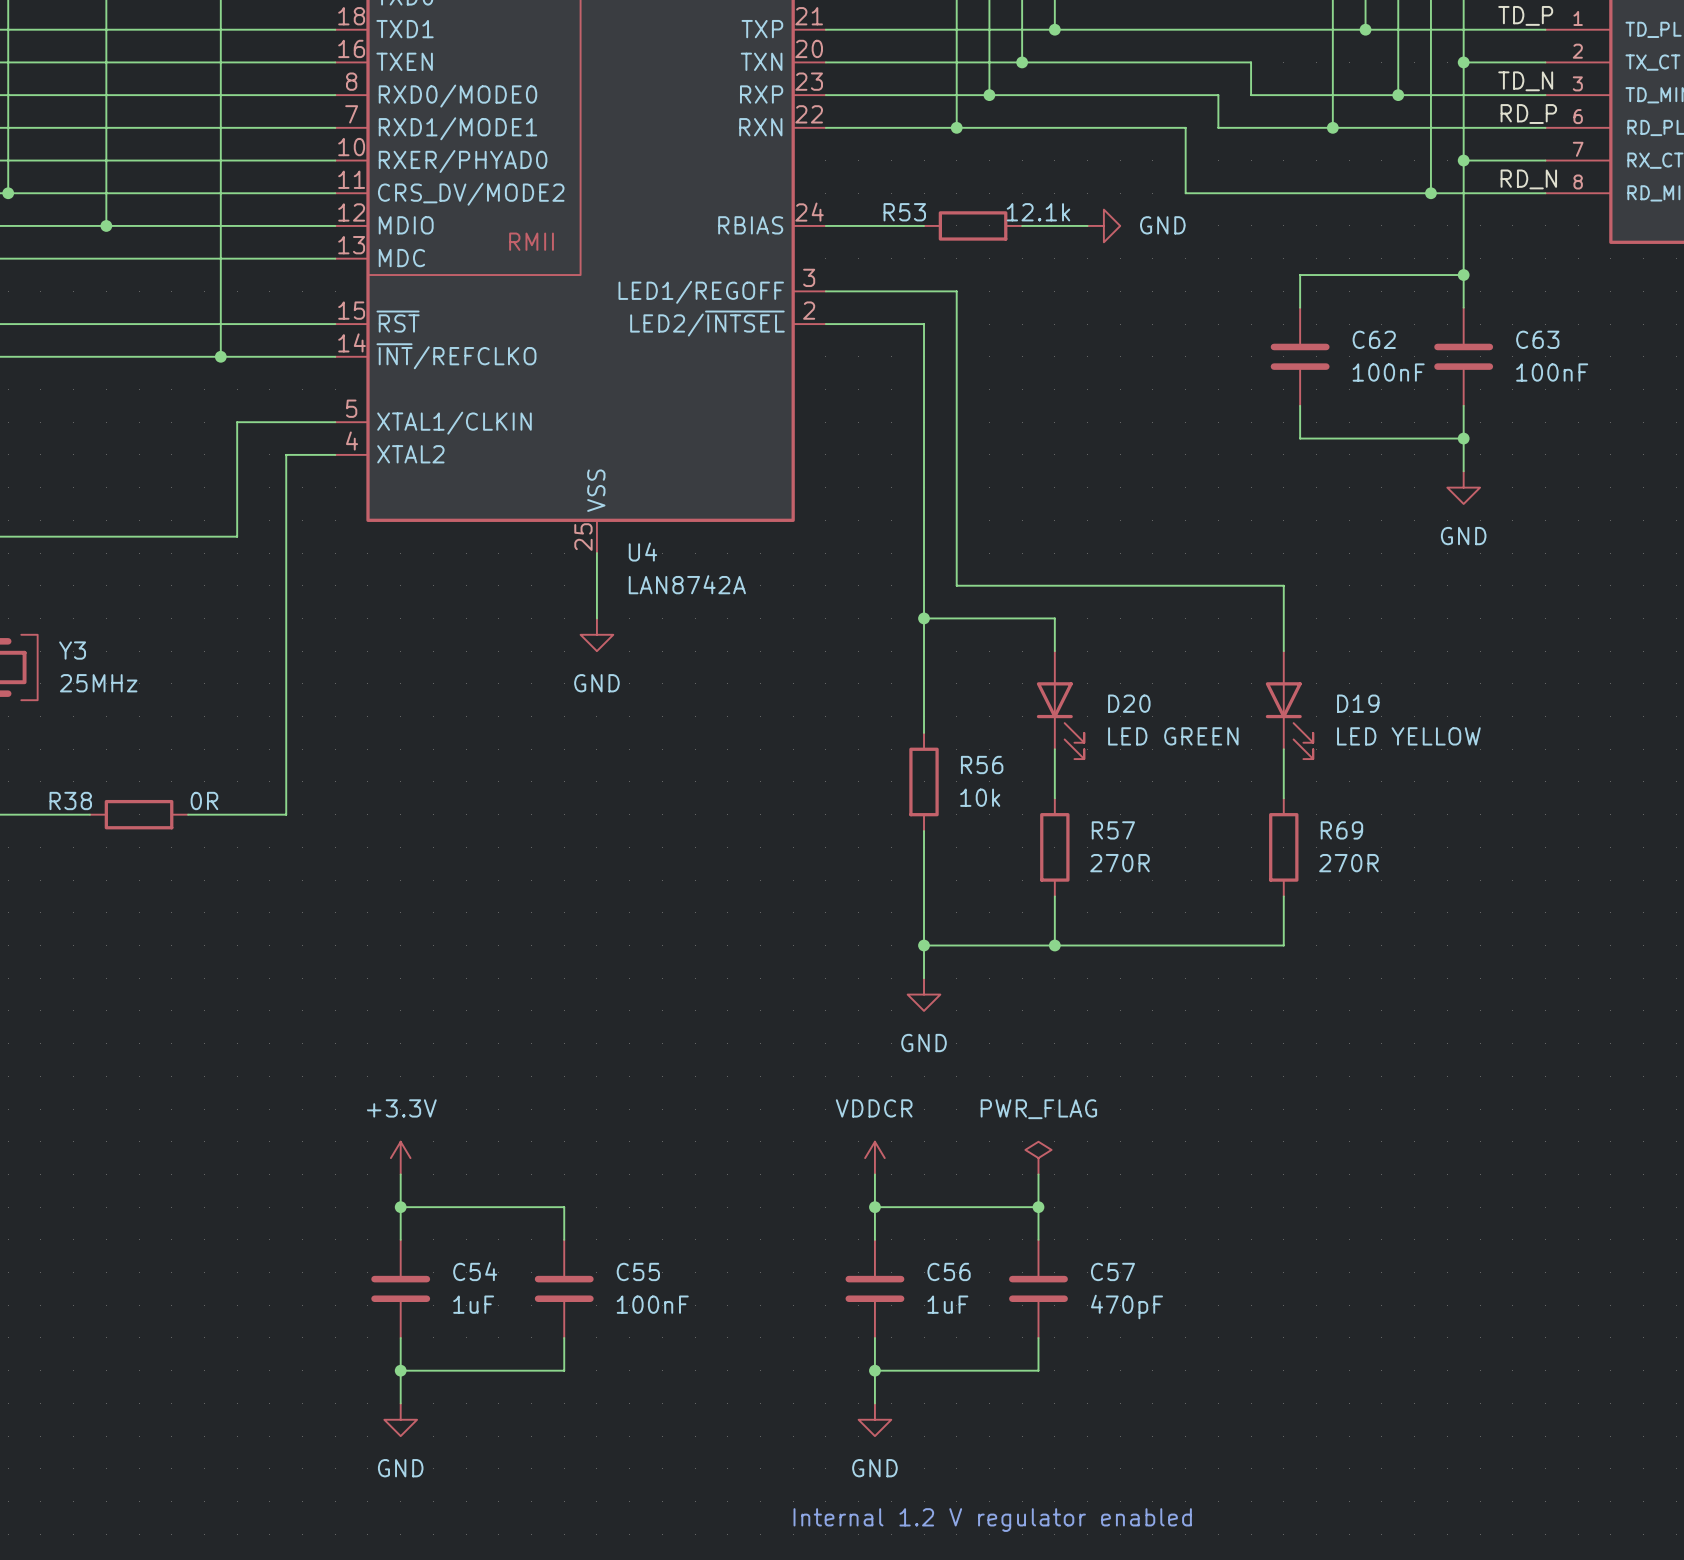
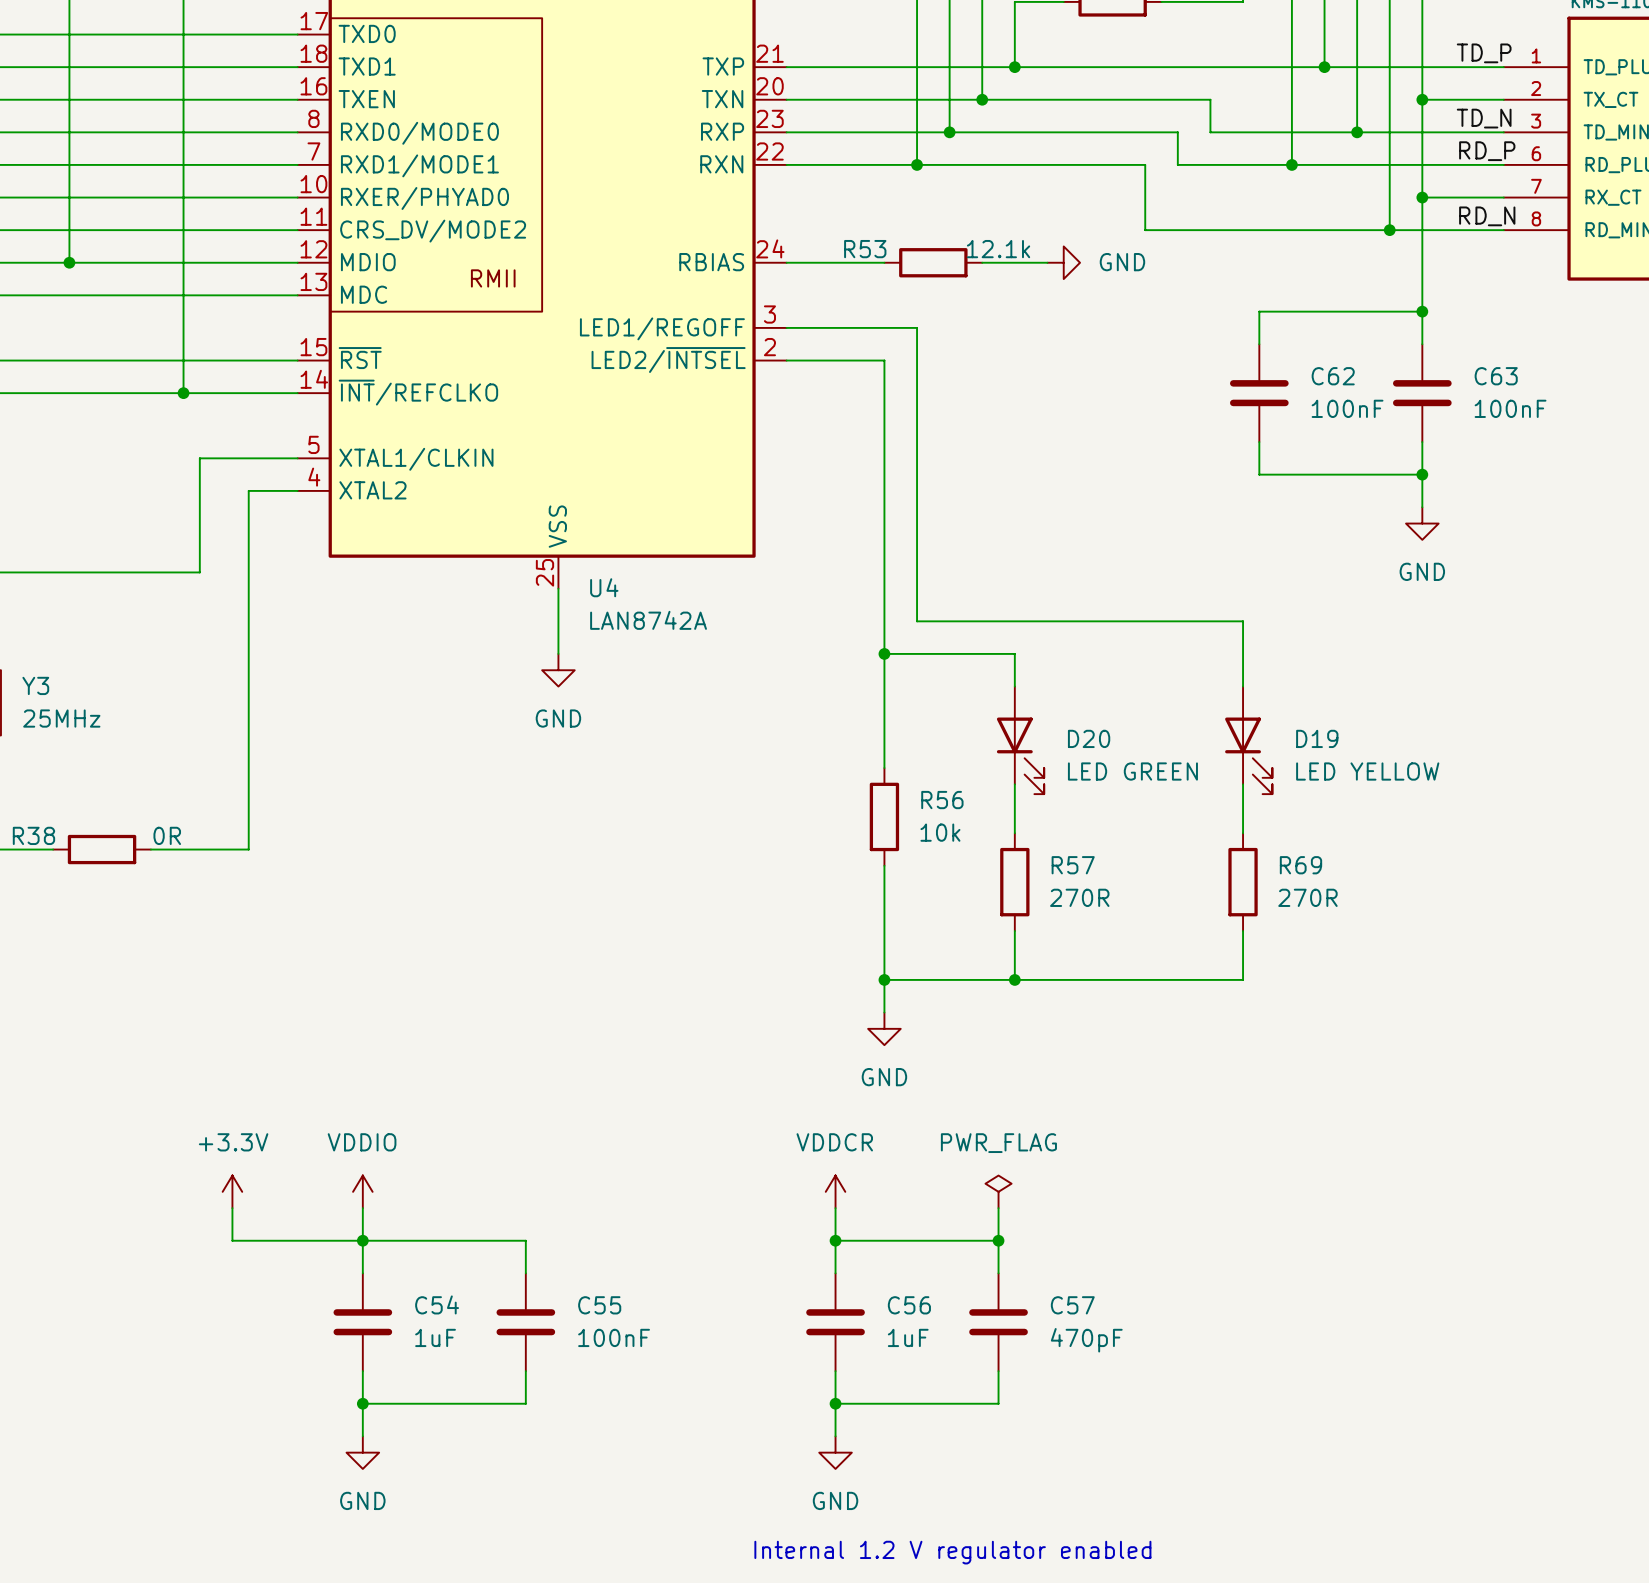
power symbol: none -> +3.3V (232, 1191)
power symbol: +3.3V (400, 1158) -> VDDIO (362, 1191)
wire: none -> (232, 1208) (232, 1240) (362, 1240)

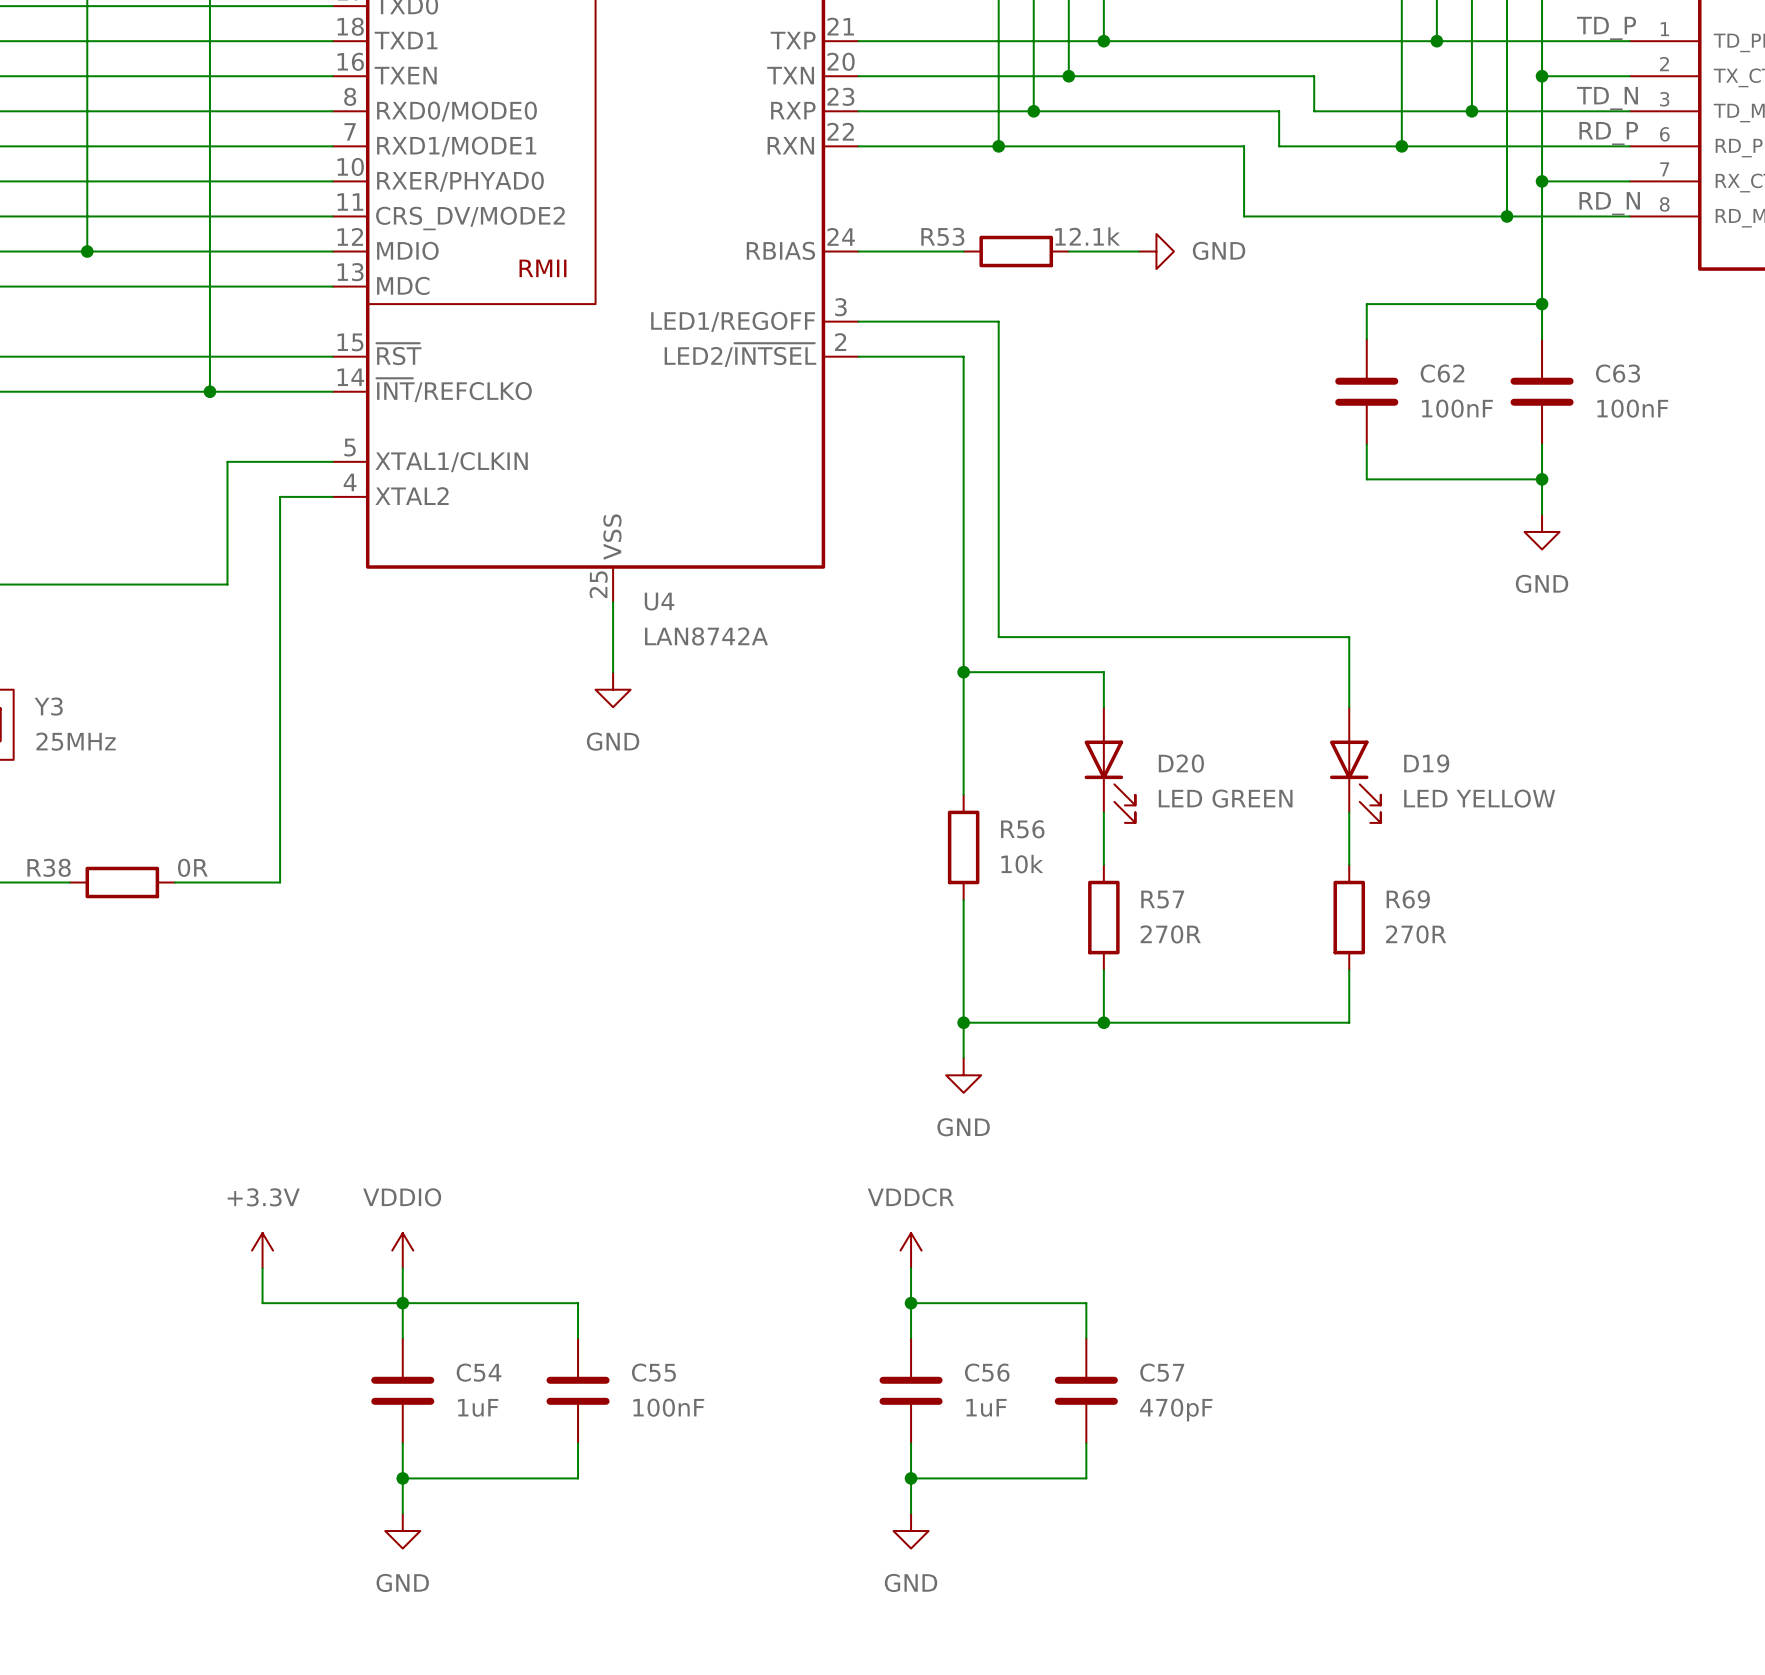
power symbol: PWR_FLAG (998, 1191) -> none
wire: (998, 1208) (998, 1240) -> none
junction: (998, 1240) -> none
text: Internal 1.2 V regulator enabled (952, 1552) -> none

